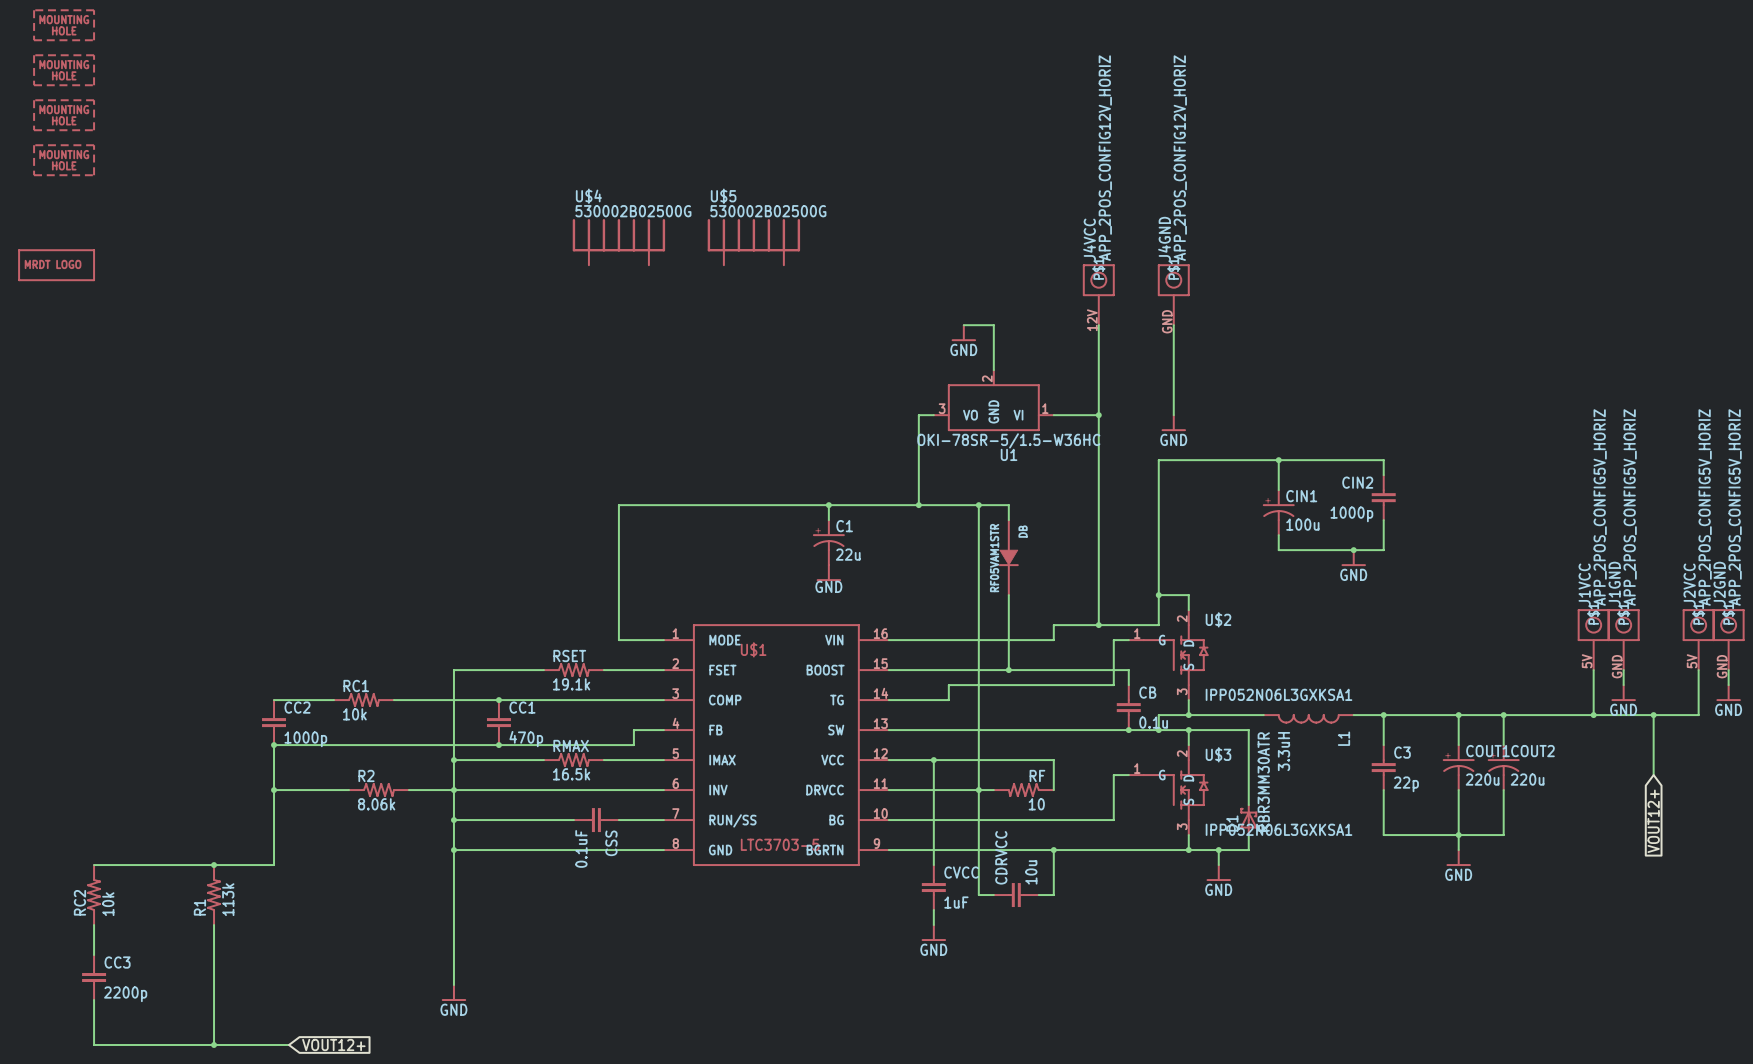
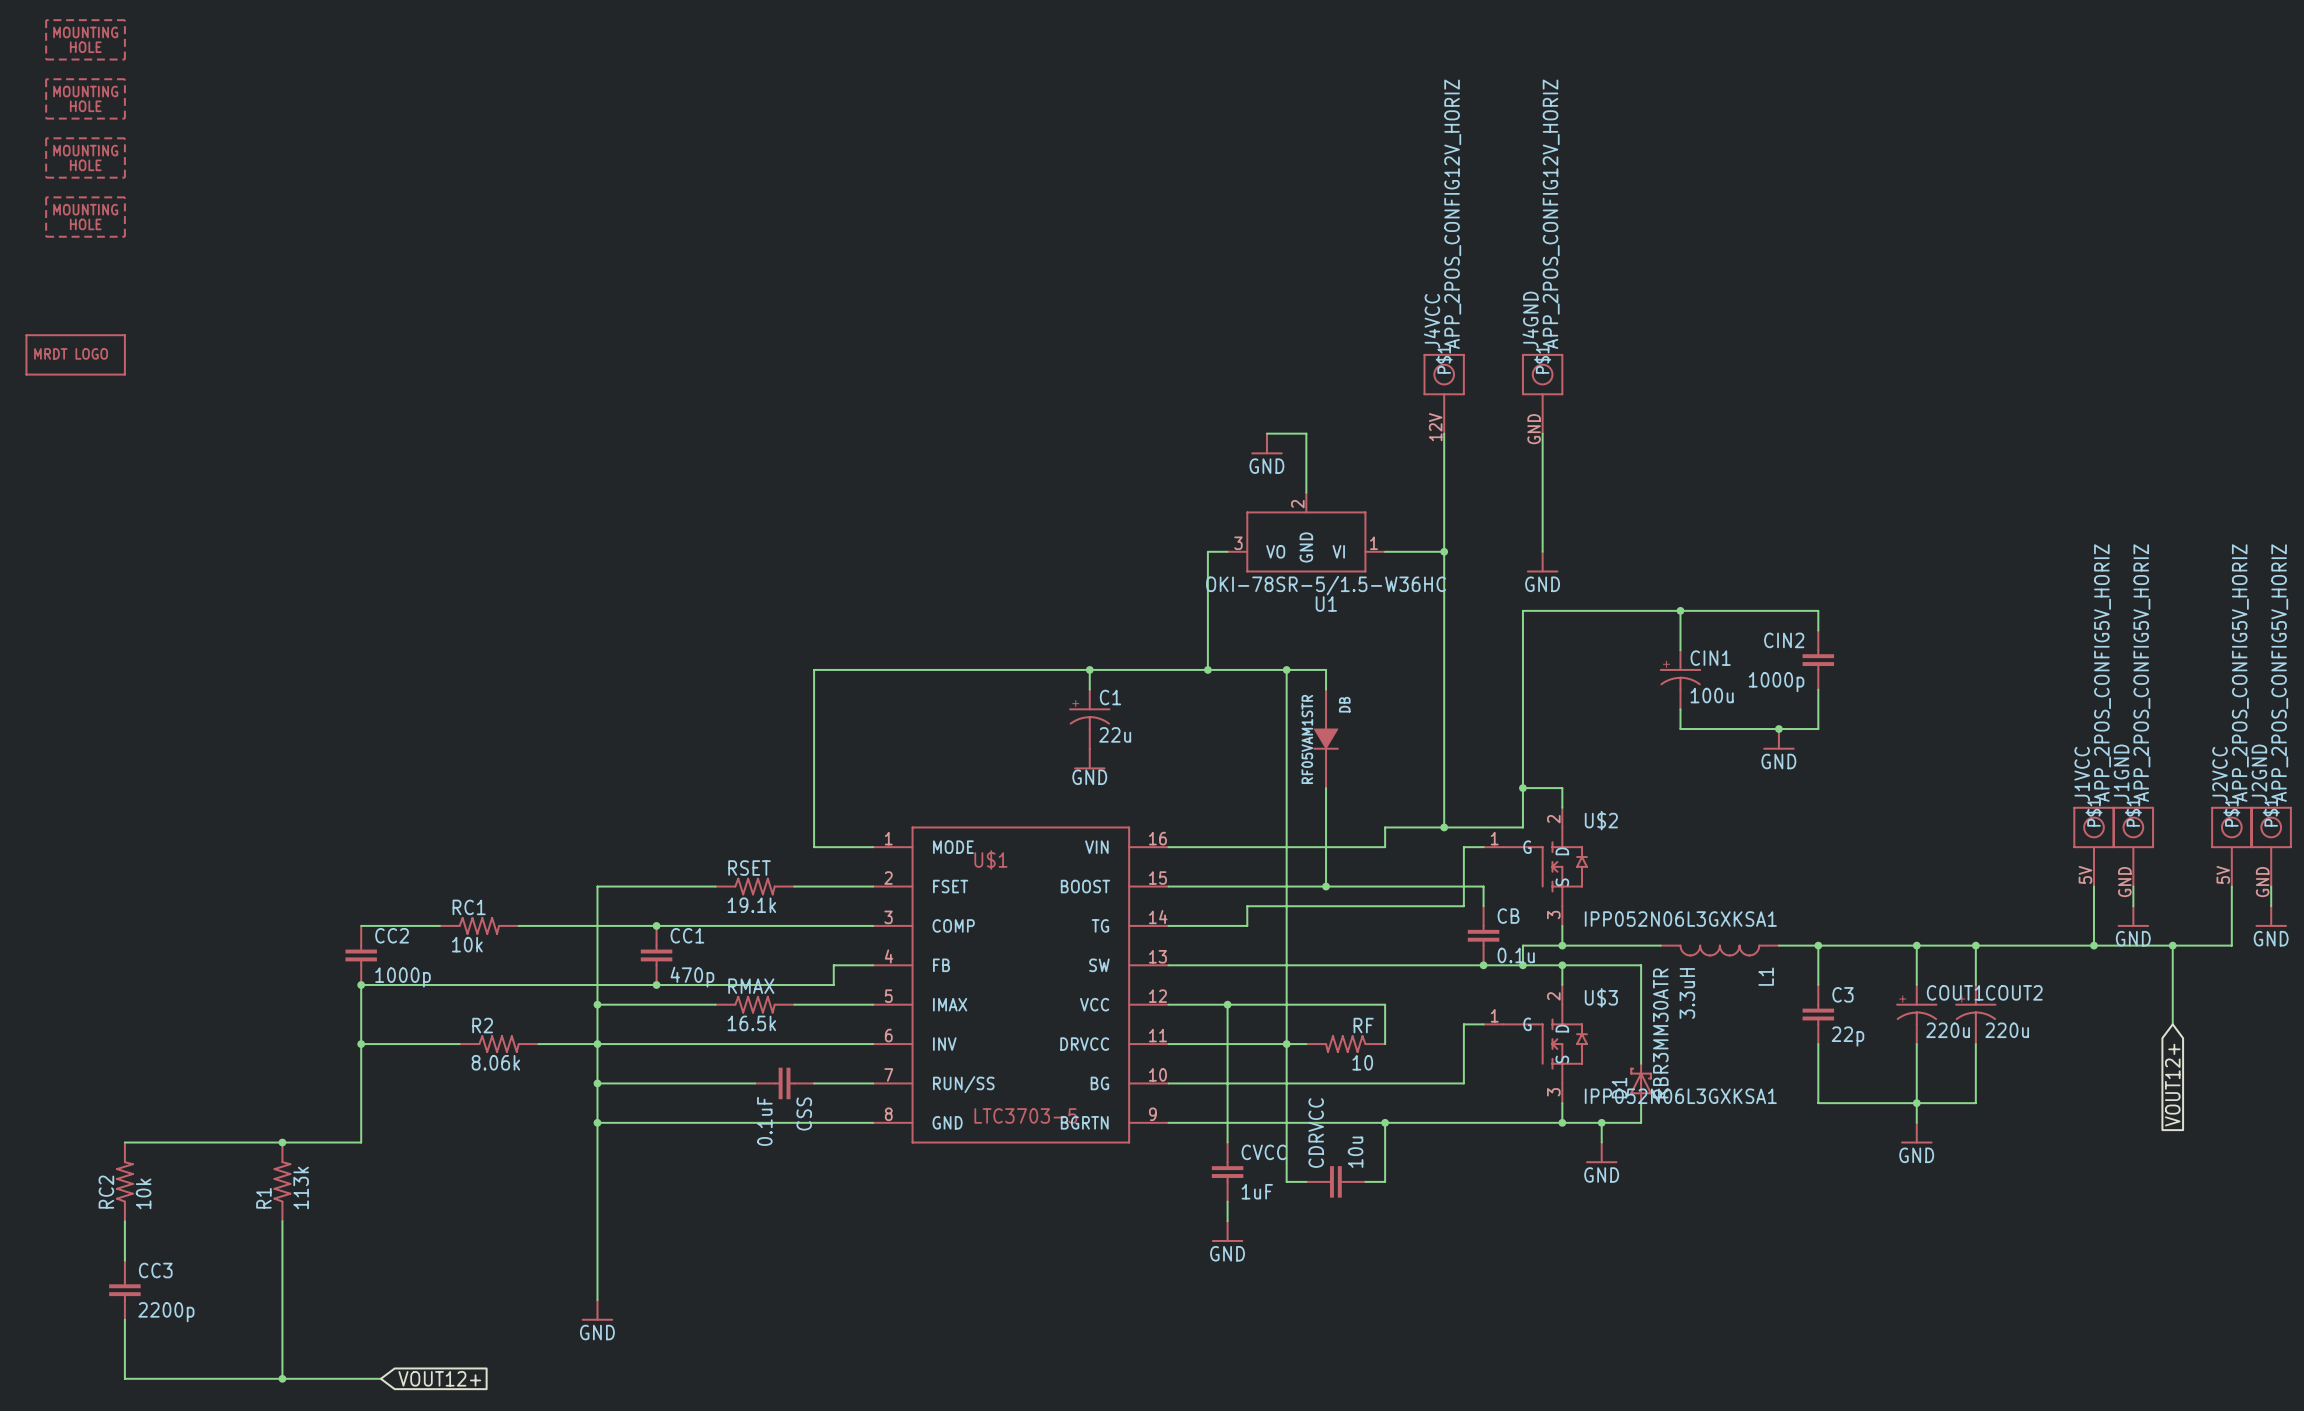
U$4: 530002B02500G (618, 242) -> none
U$5: 530002B02500G (753, 242) -> none

